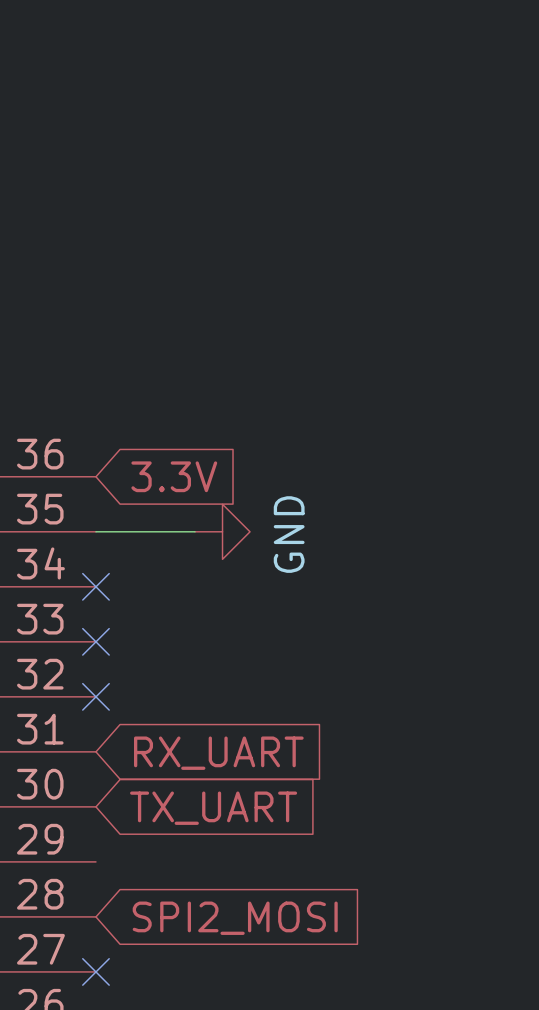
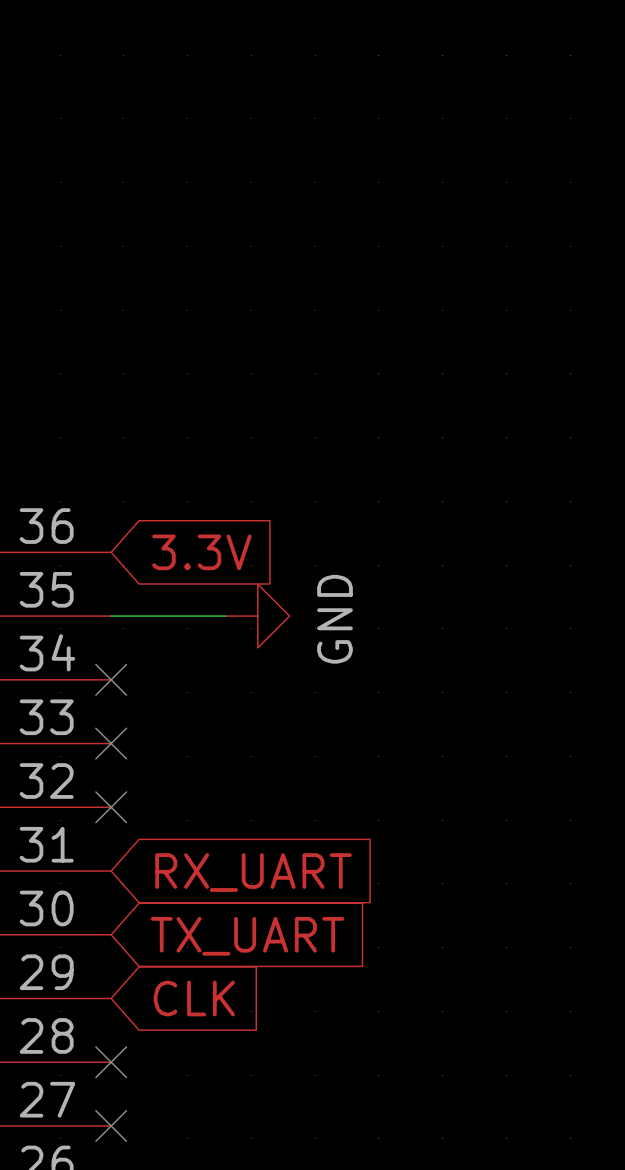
global label: none -> CLK (194, 998)
no-connect mark: none -> (111, 1062)
global label: SPI2_MOSI (235, 918) -> none

